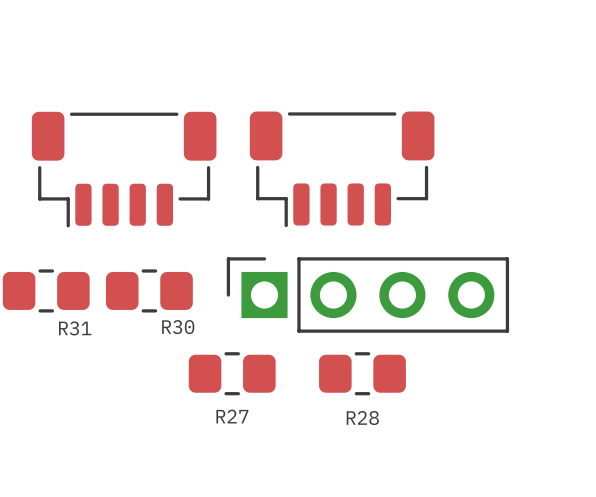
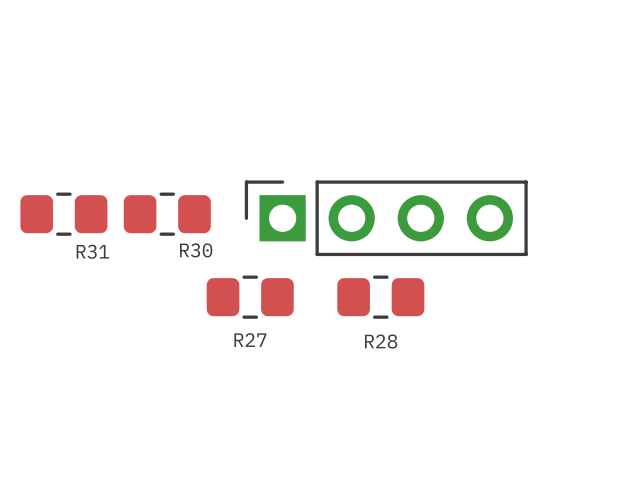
part: (124, 169) -> none
part: (342, 169) -> none

